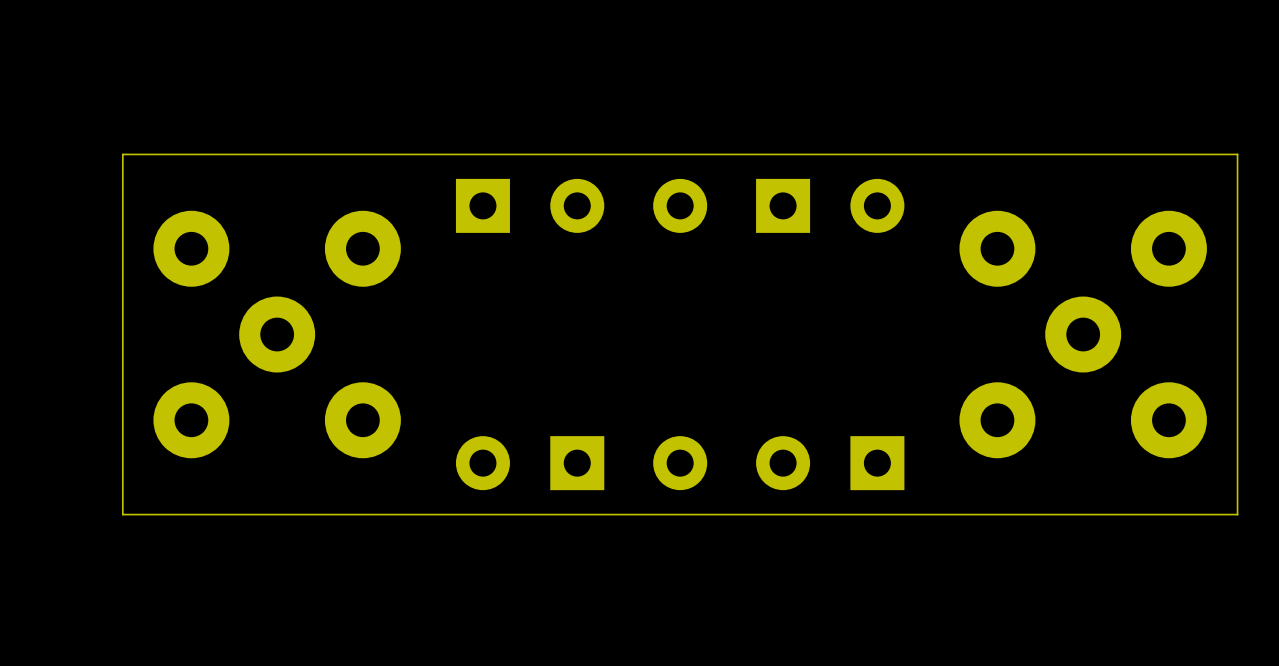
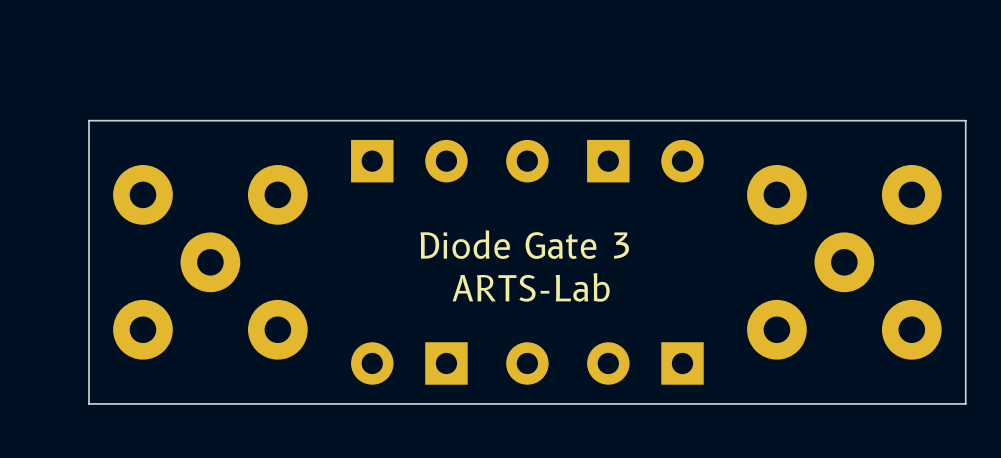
text: none -> Diode Gate 3 (524, 244)
text: none -> ARTS-Lab (531, 287)

